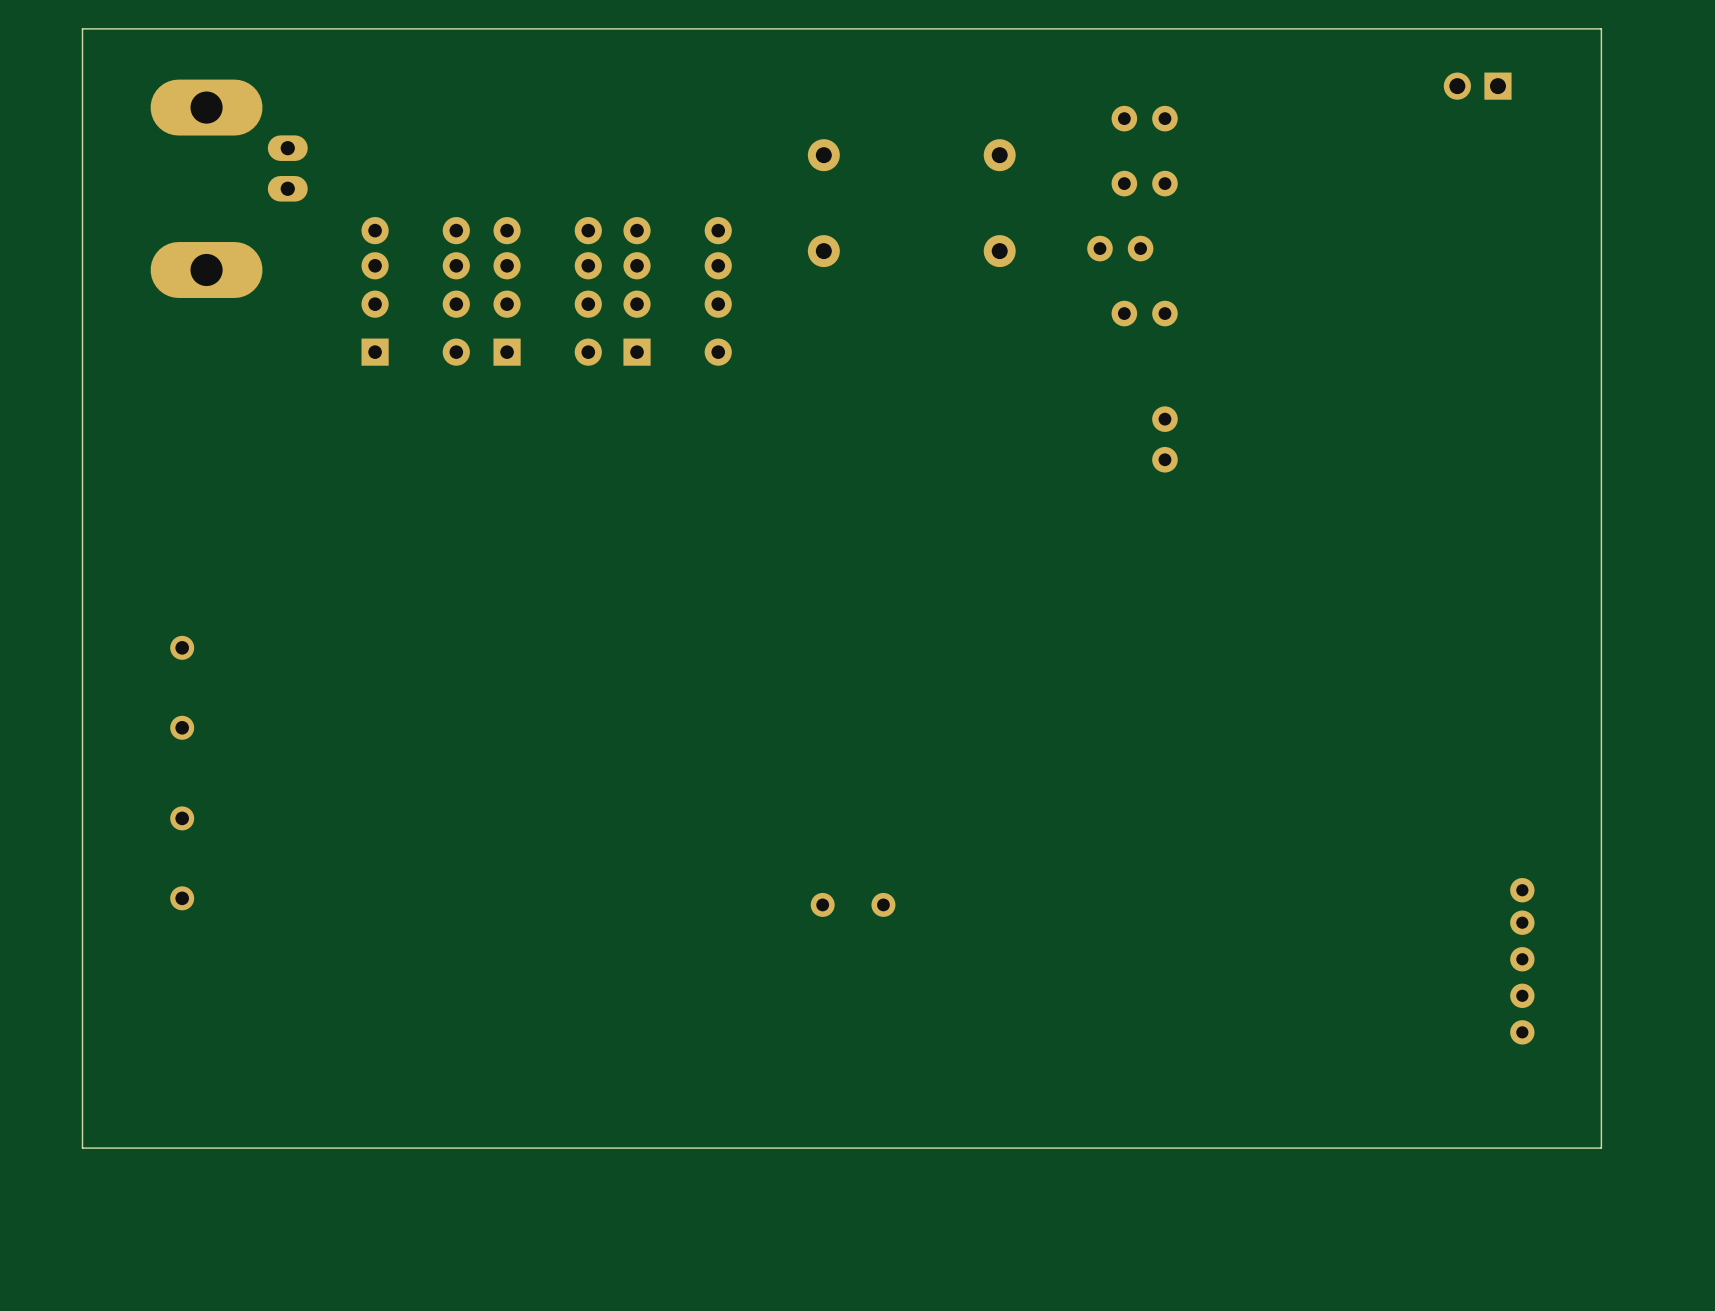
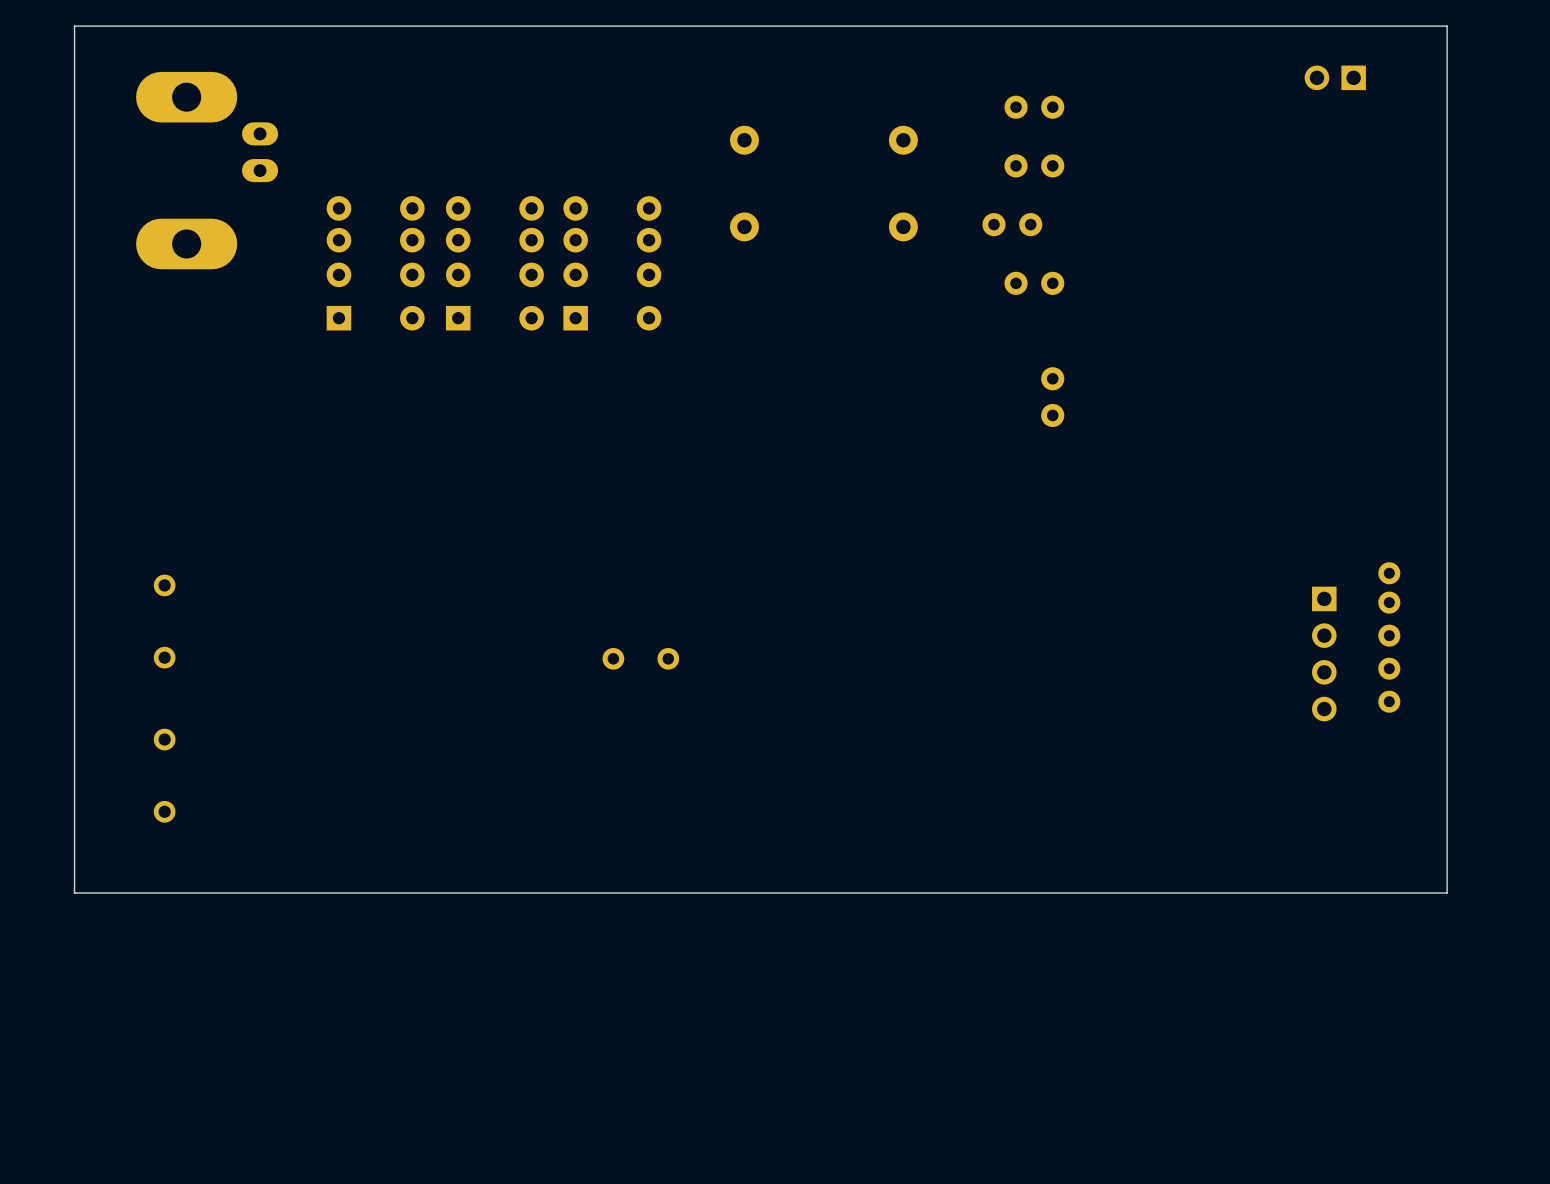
part: none -> (1324, 653)
part position: (853, 904) -> (640, 658)
part position: (1522, 961) -> (1389, 637)
board edge: (1601, 988) (1601, 1148) (82, 1148) (82, 988) -> (1447, 892) (74, 892)

